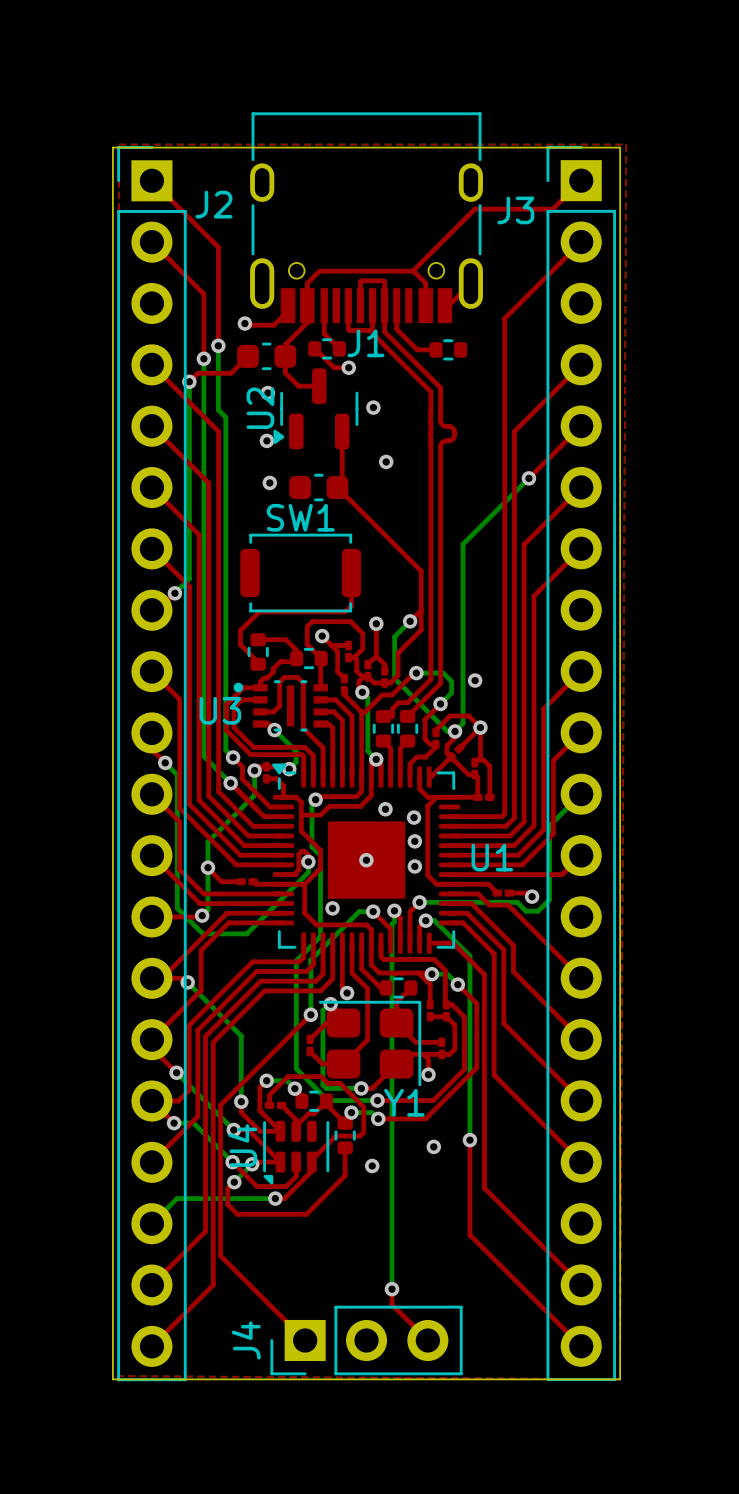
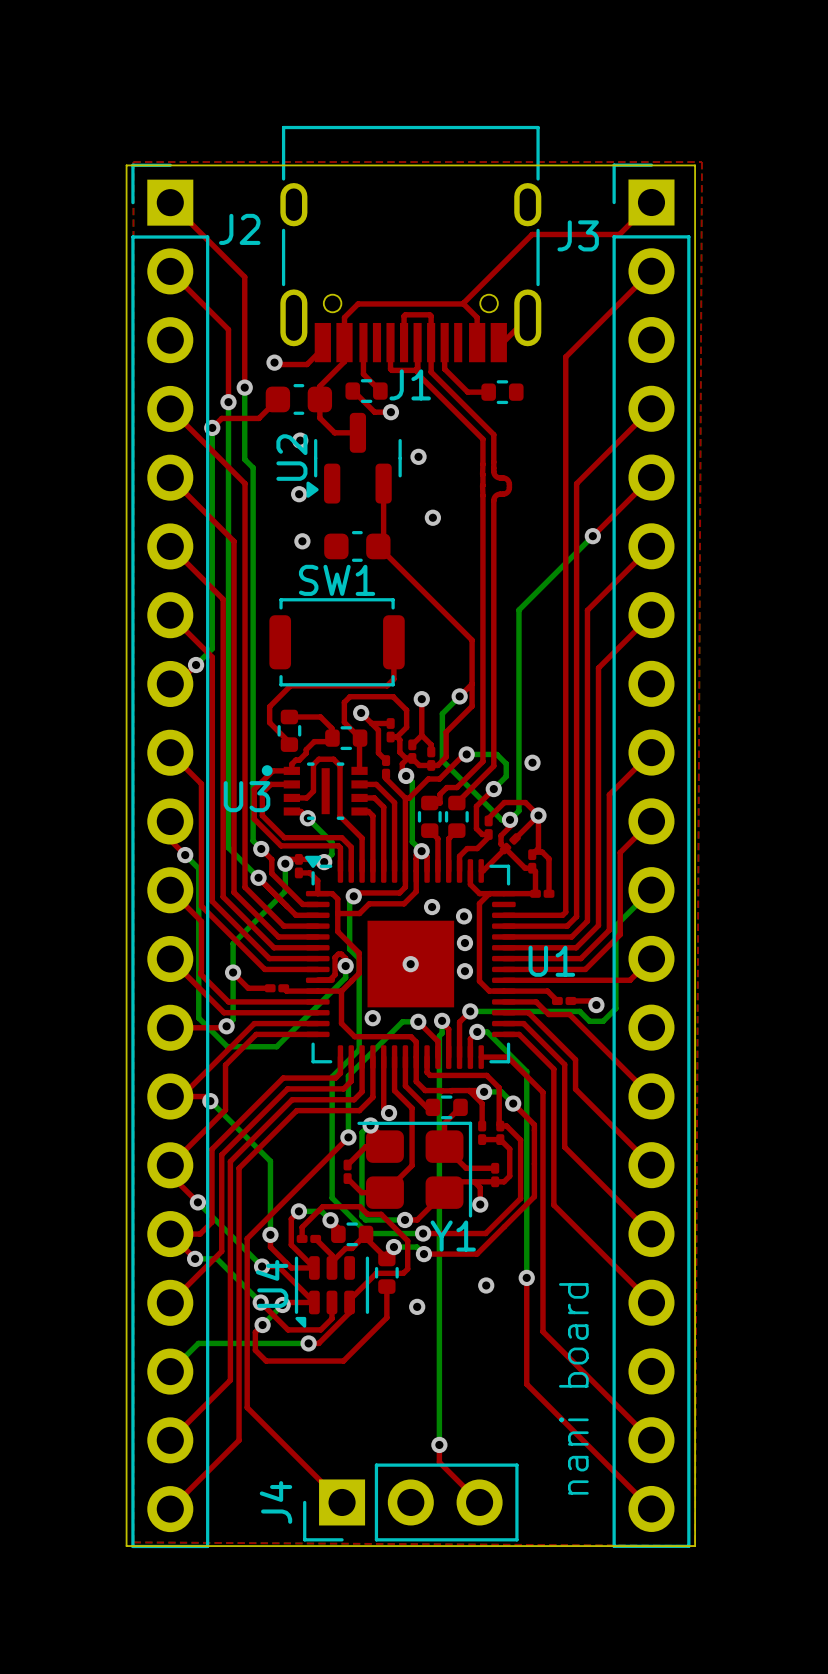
text: none -> nani board (573, 1388)

